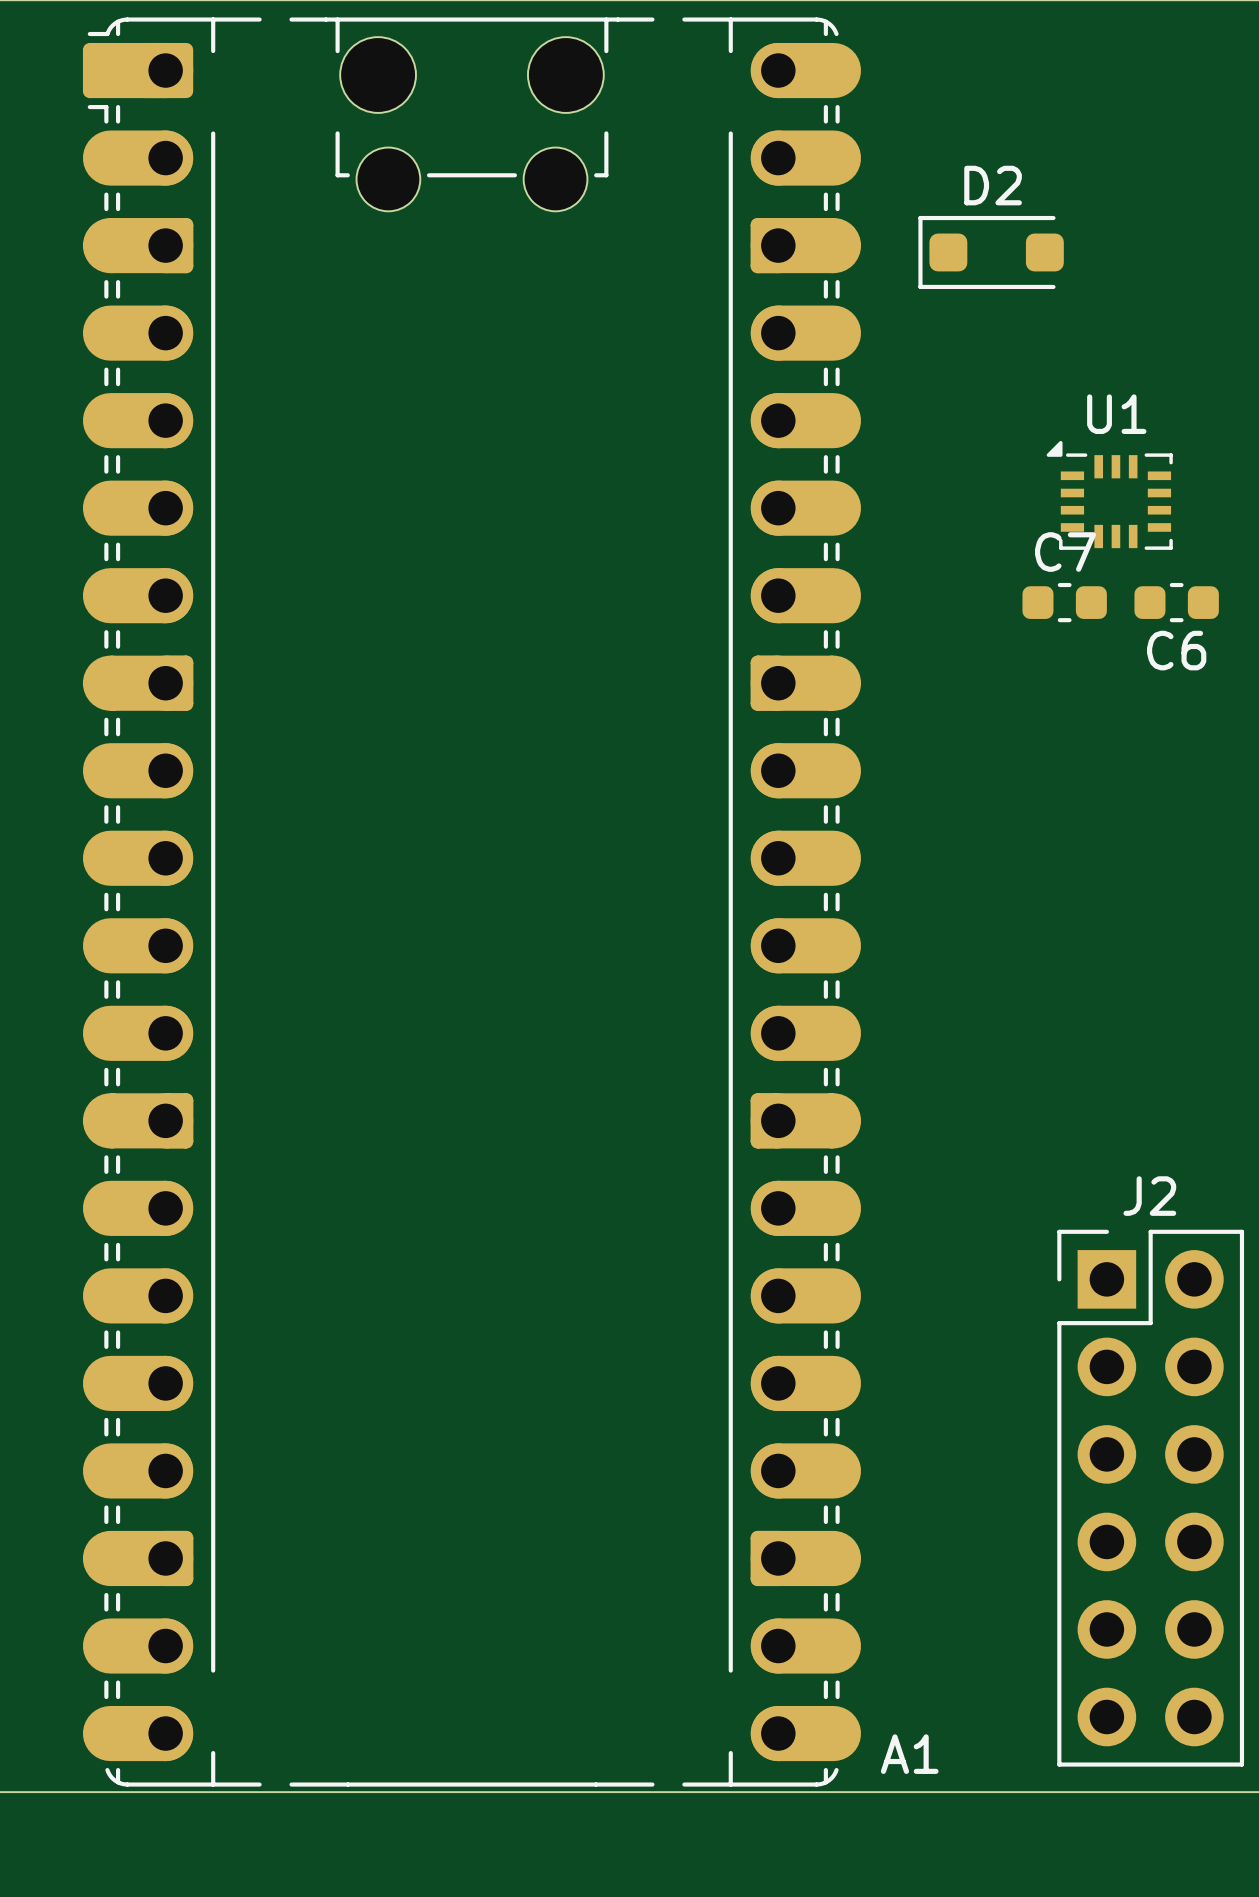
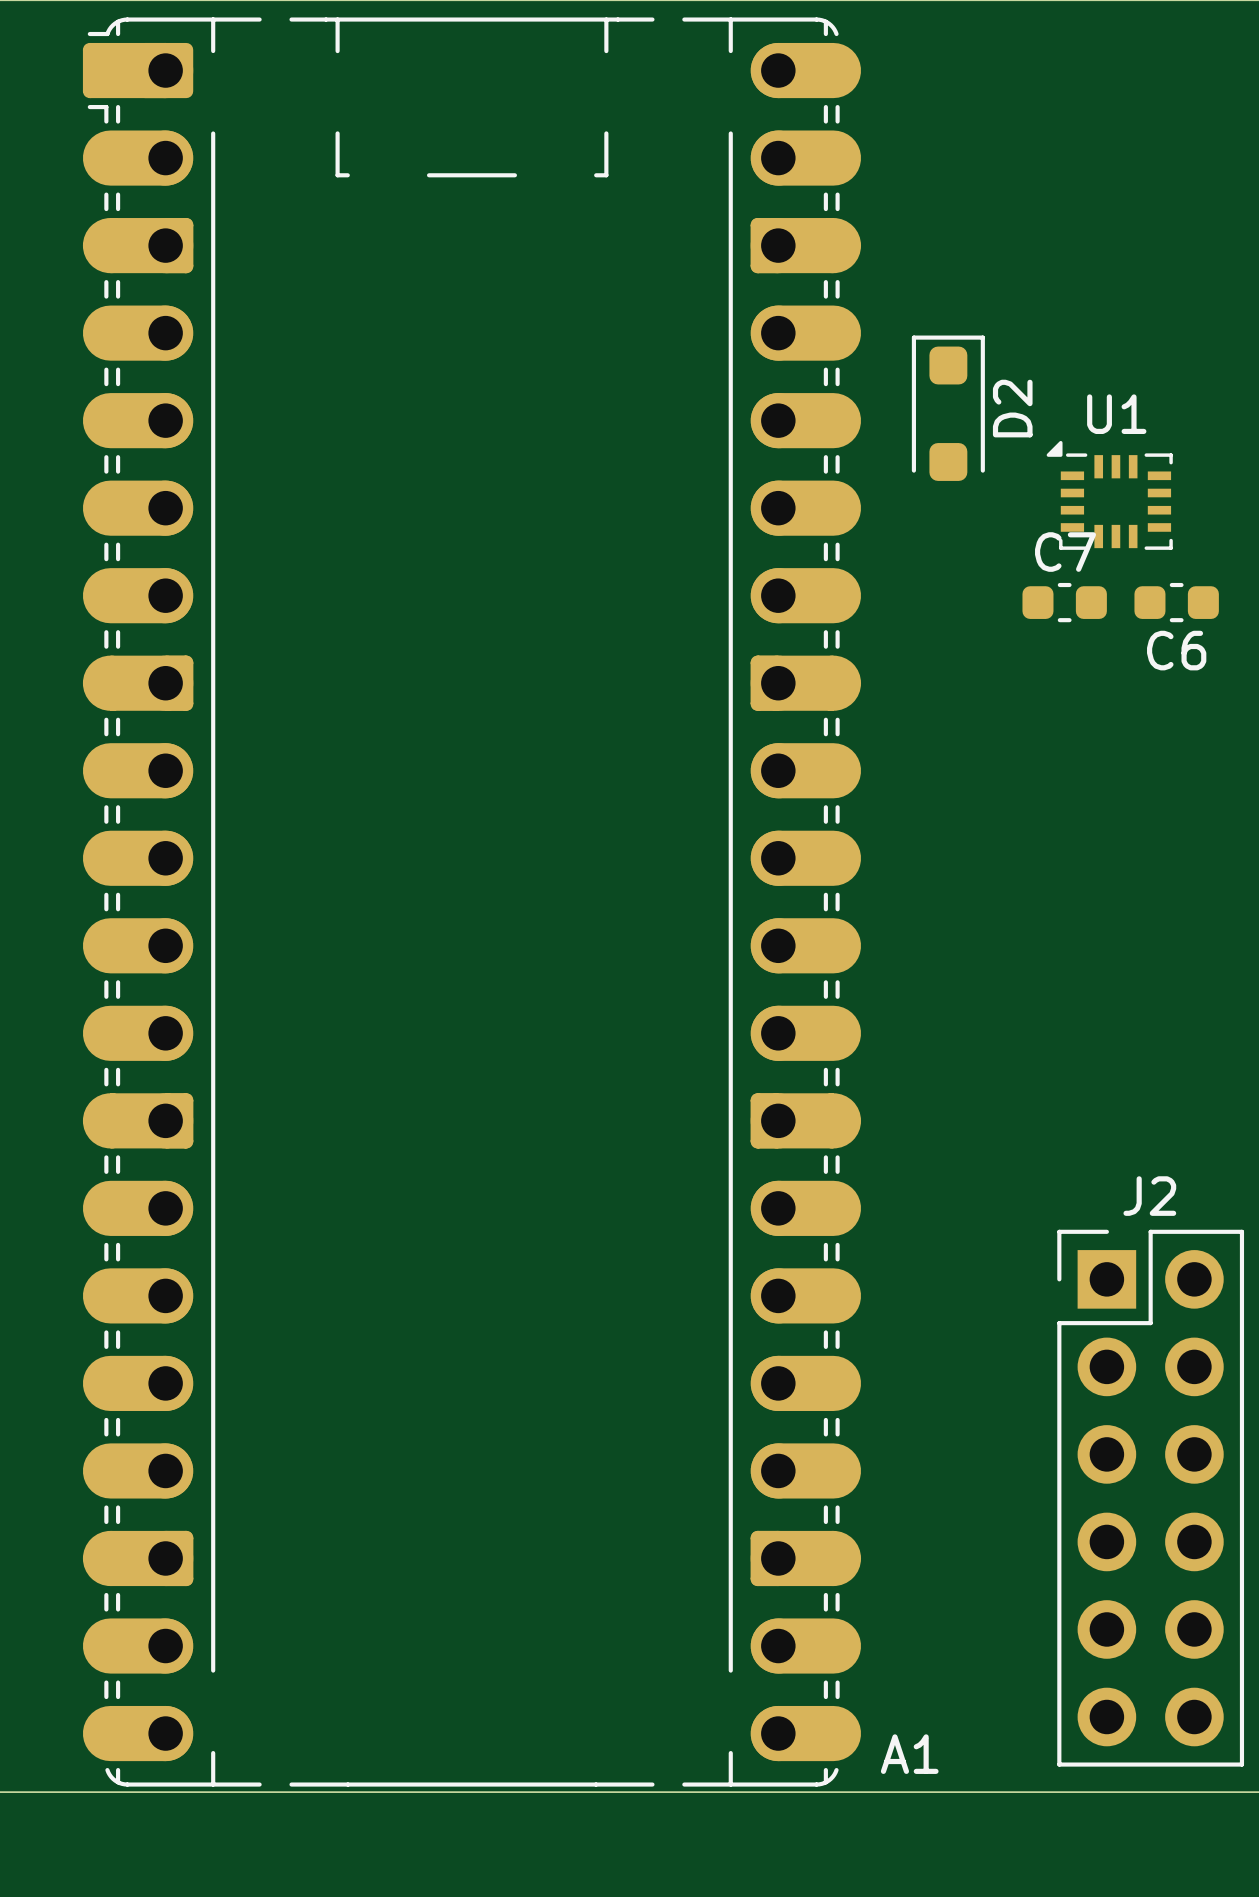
A1 footprint: [82, 17, 862, 1787] -> [82, 17, 862, 1787]
D2 rotation: 0° (991, 252) -> 90° clockwise (948, 408)
D2 position: (991, 252) -> (948, 408)

